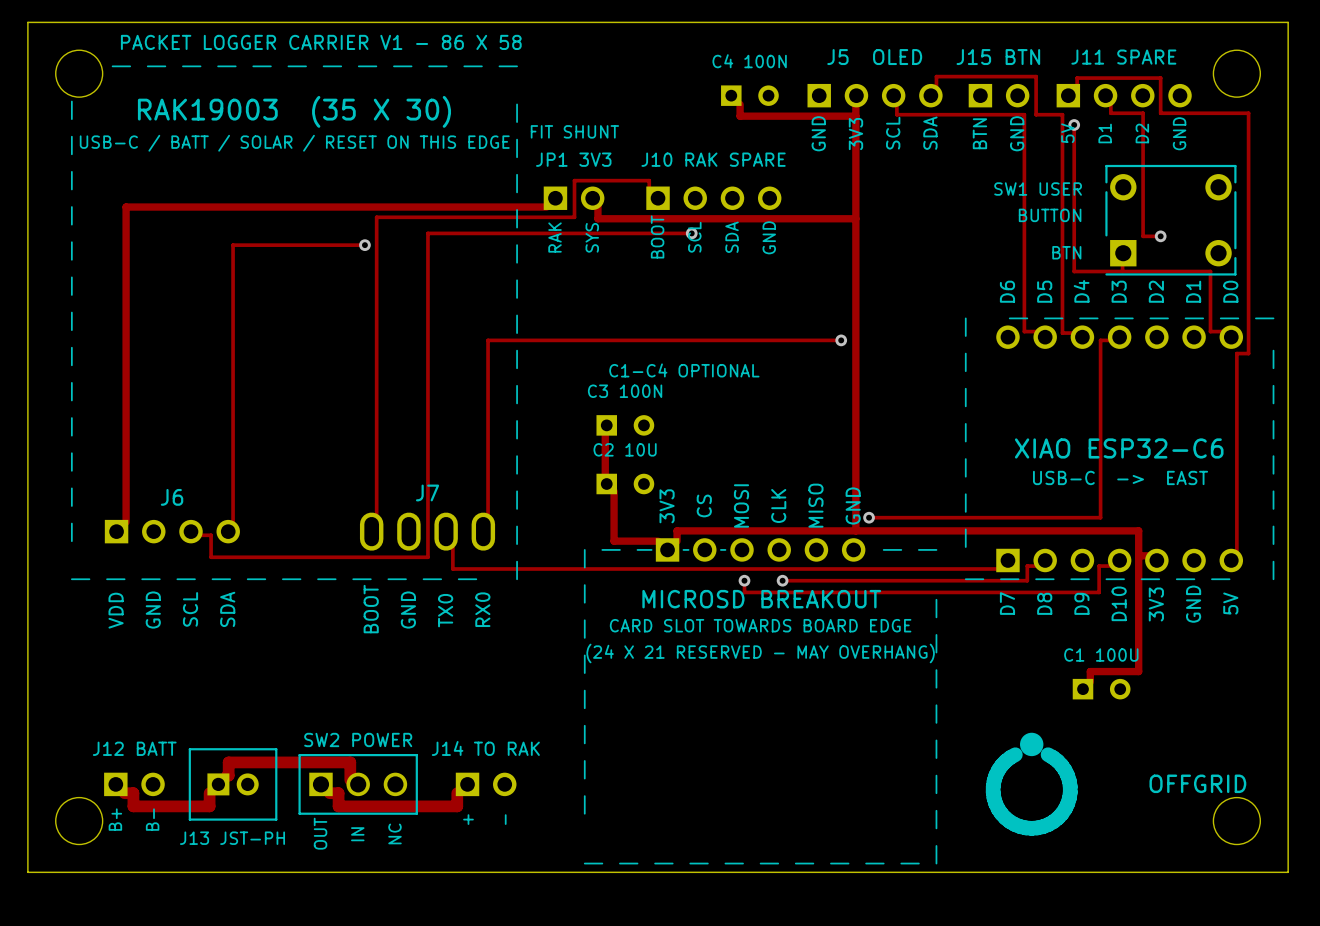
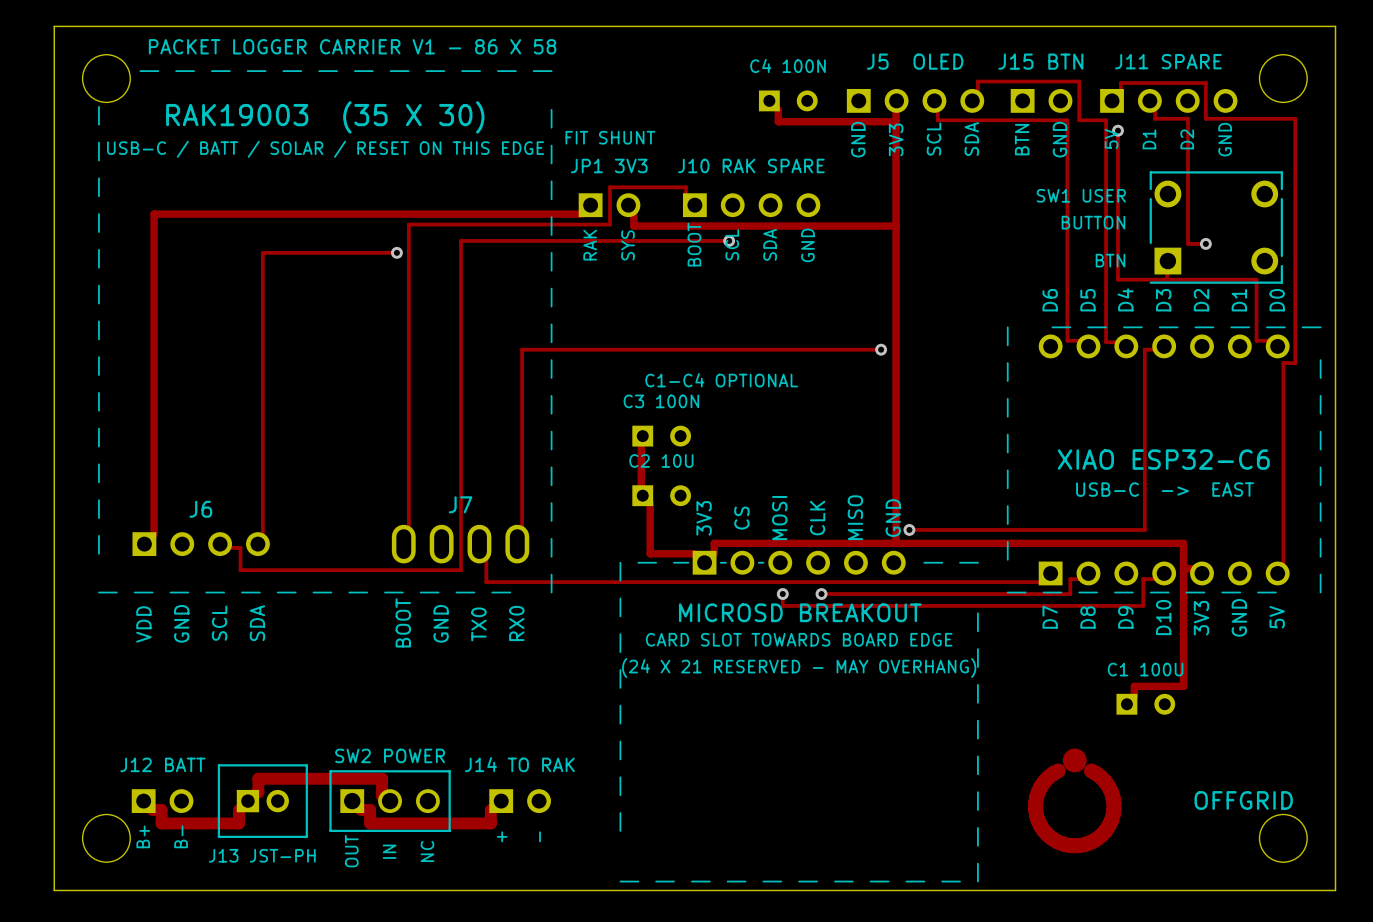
drawing shape: [1020, 732, 1044, 757] -> [1062, 748, 1087, 773]
line: (1015, 754) (1005, 761) (998, 770) (994, 780) (993, 798) (998, 808) (1005, 817) (1020, 826) (1031, 828) (1043, 826) (1058, 817) (1065, 808) (1069, 798) (1069, 780) (1064, 770) (1057, 761) (1048, 754) -> none
track: none -> (1058, 770) (1048, 777) (1040, 786) (1036, 797) (1036, 815) (1040, 825) (1047, 835) (1063, 844) (1074, 845) (1086, 844) (1101, 835) (1108, 825) (1113, 815) (1113, 797) (1108, 786) (1101, 777) (1091, 770)

